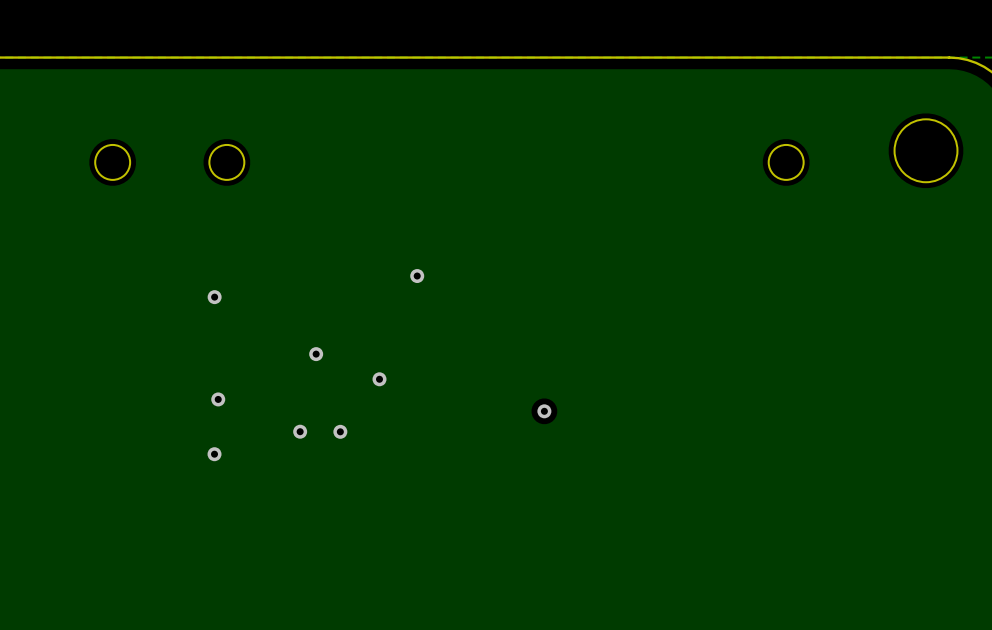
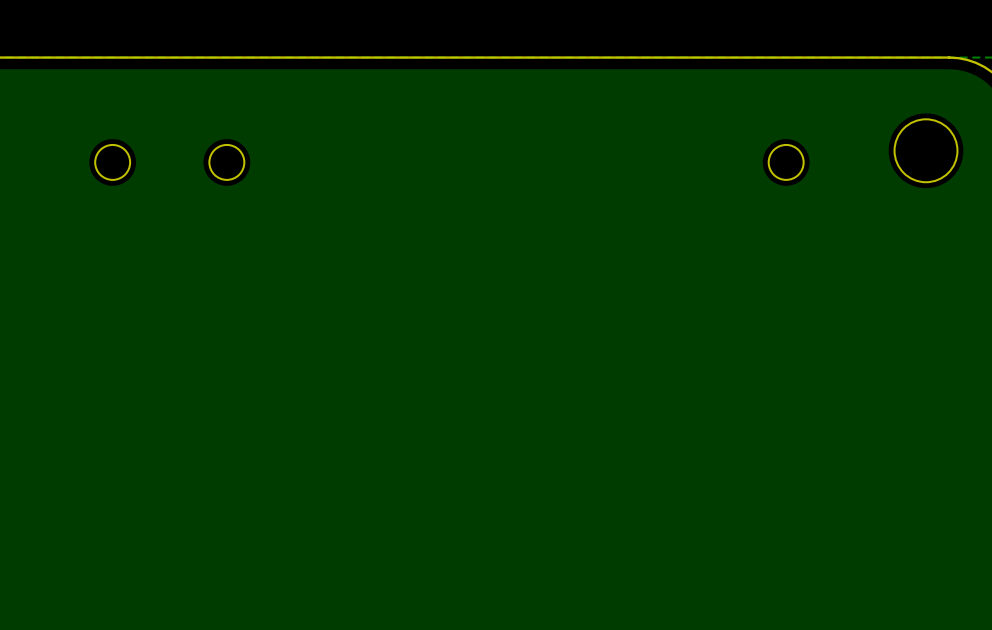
via: (417, 276) -> none
via: (214, 297) -> none
via: (316, 354) -> none
via: (379, 379) -> none
via: (218, 399) -> none
via: (544, 411) -> none
via: (300, 431) -> none
via: (340, 431) -> none
via: (214, 454) -> none

